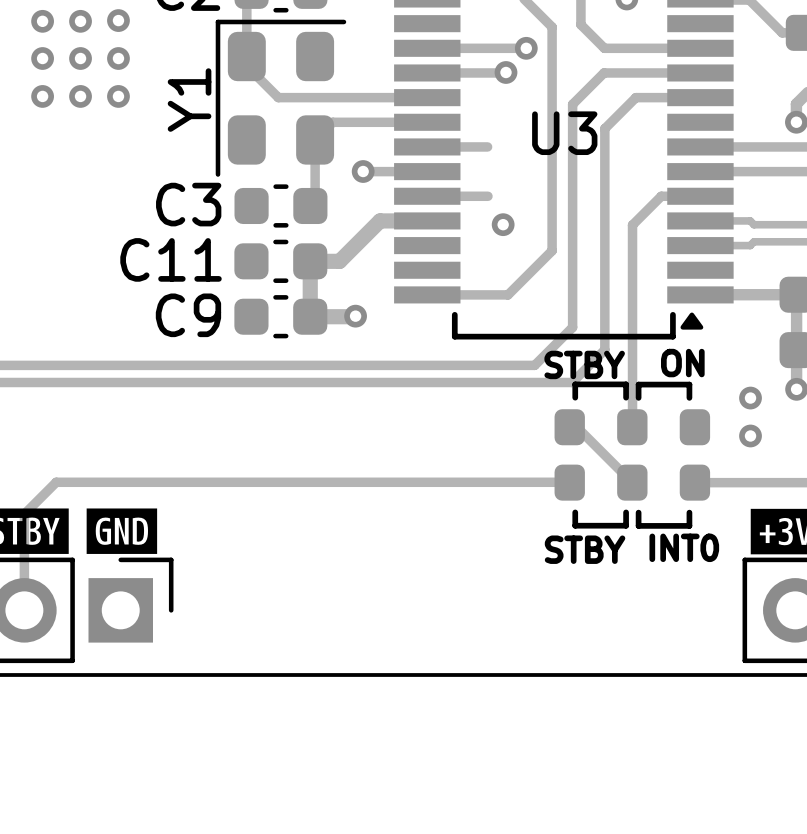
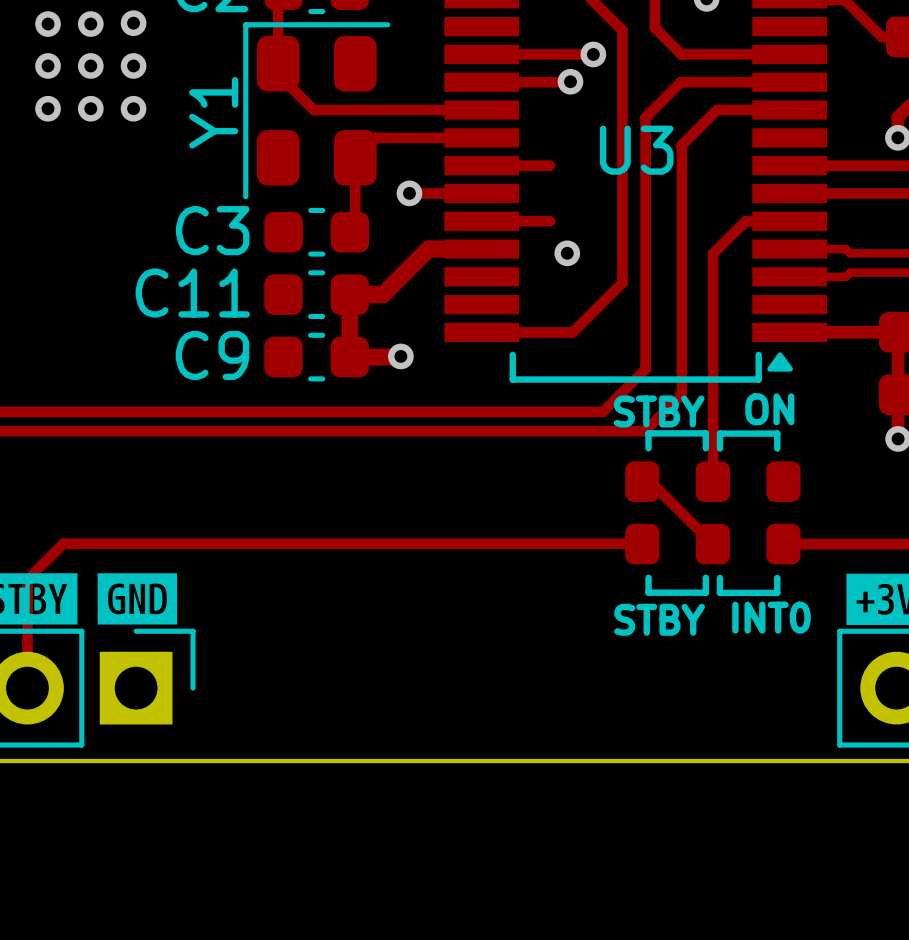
via: (750, 398) -> none
via: (750, 435) -> none

